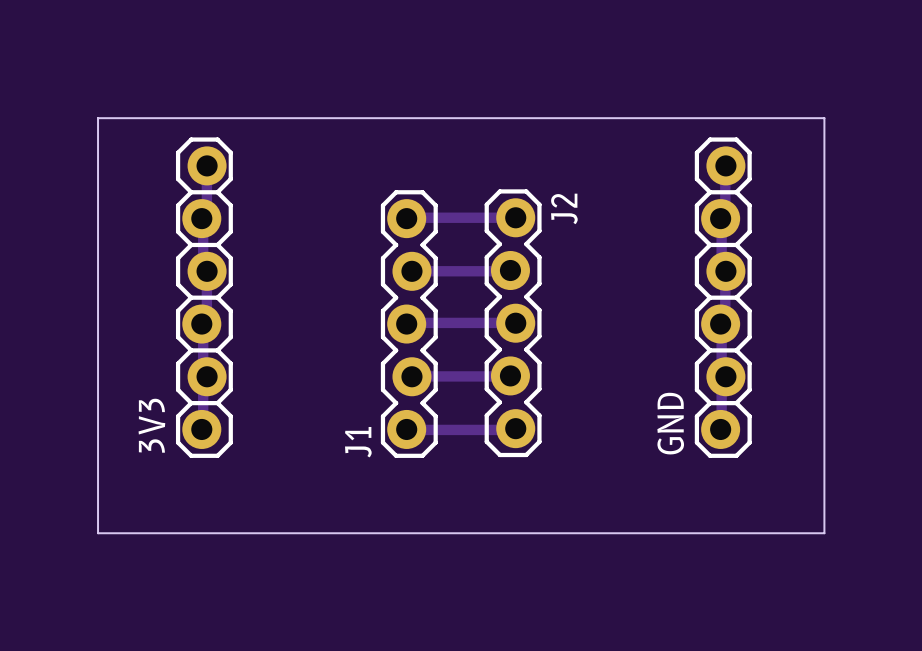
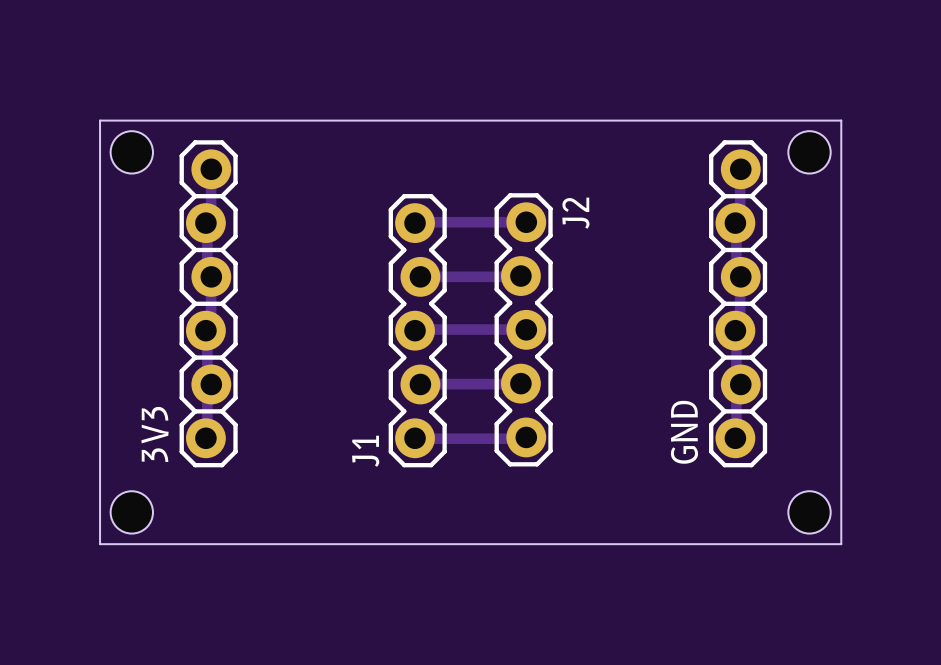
hole: none -> (131, 152)
hole: none -> (809, 152)
hole: none -> (131, 512)
hole: none -> (809, 512)

